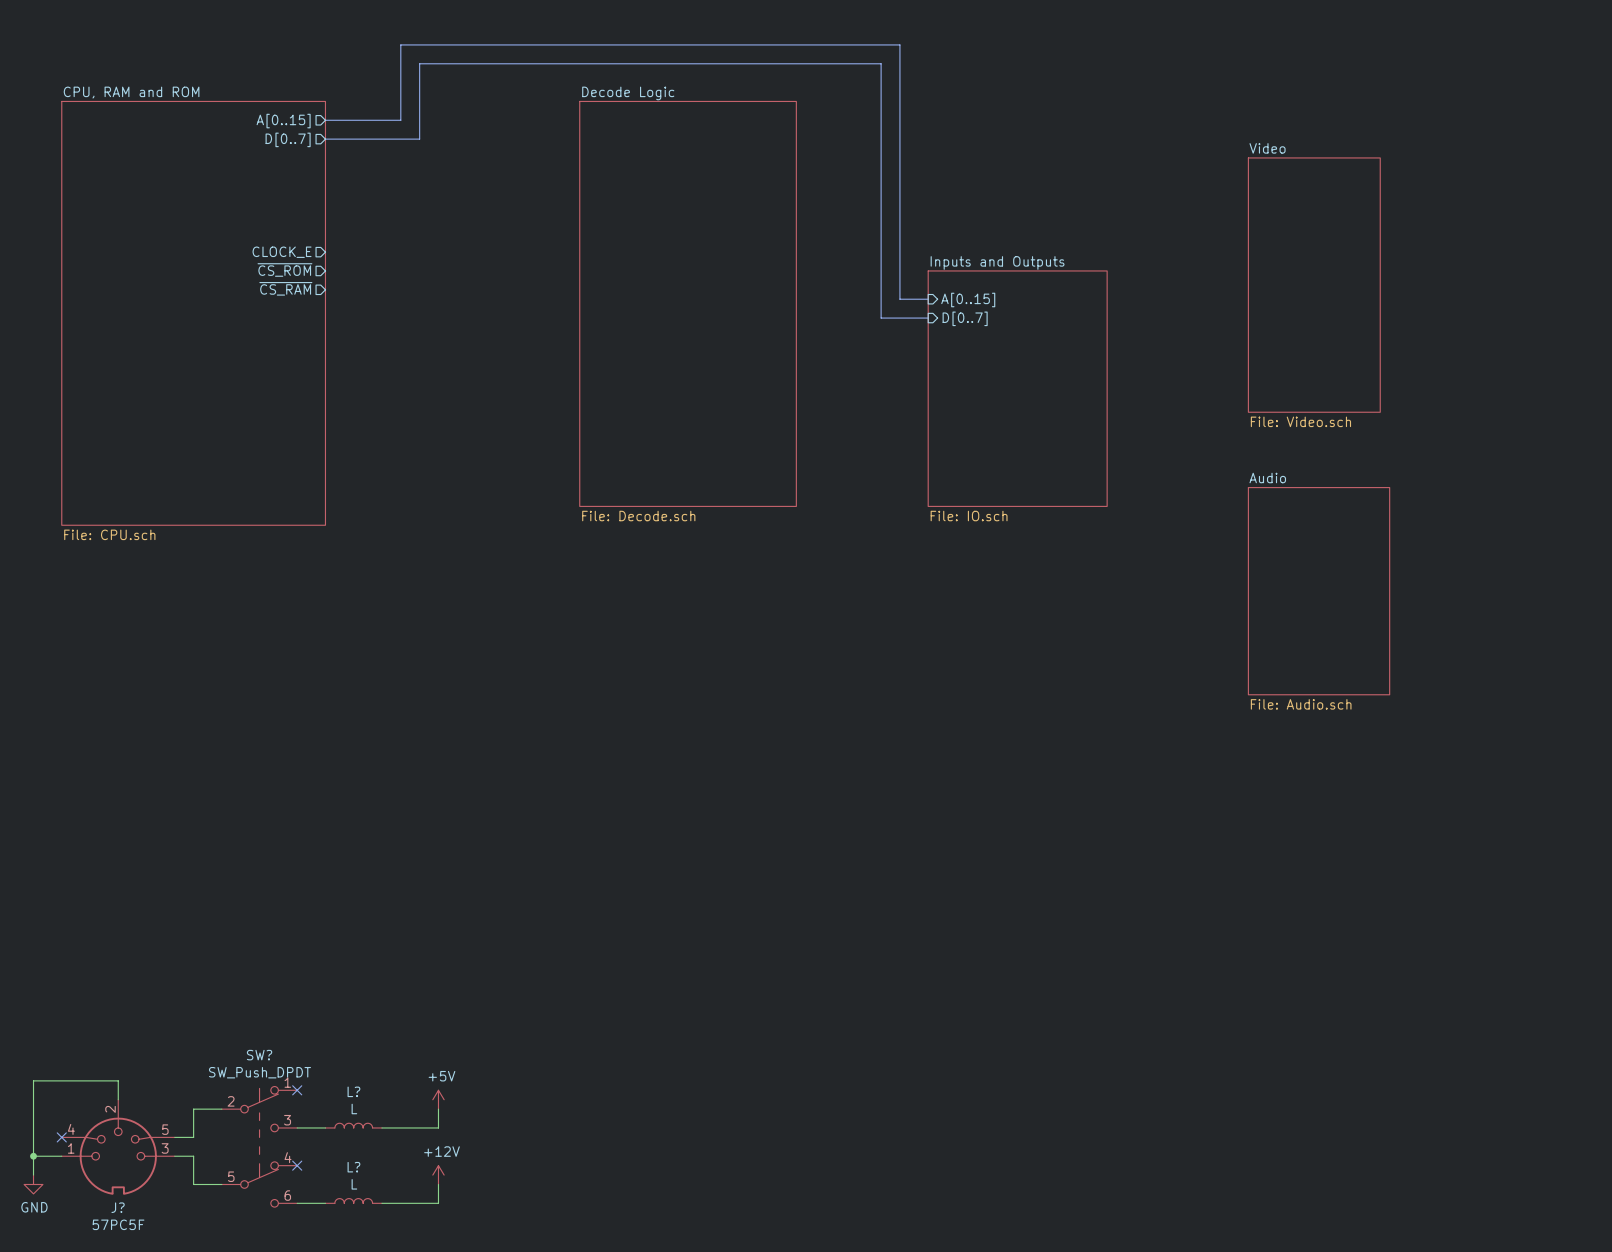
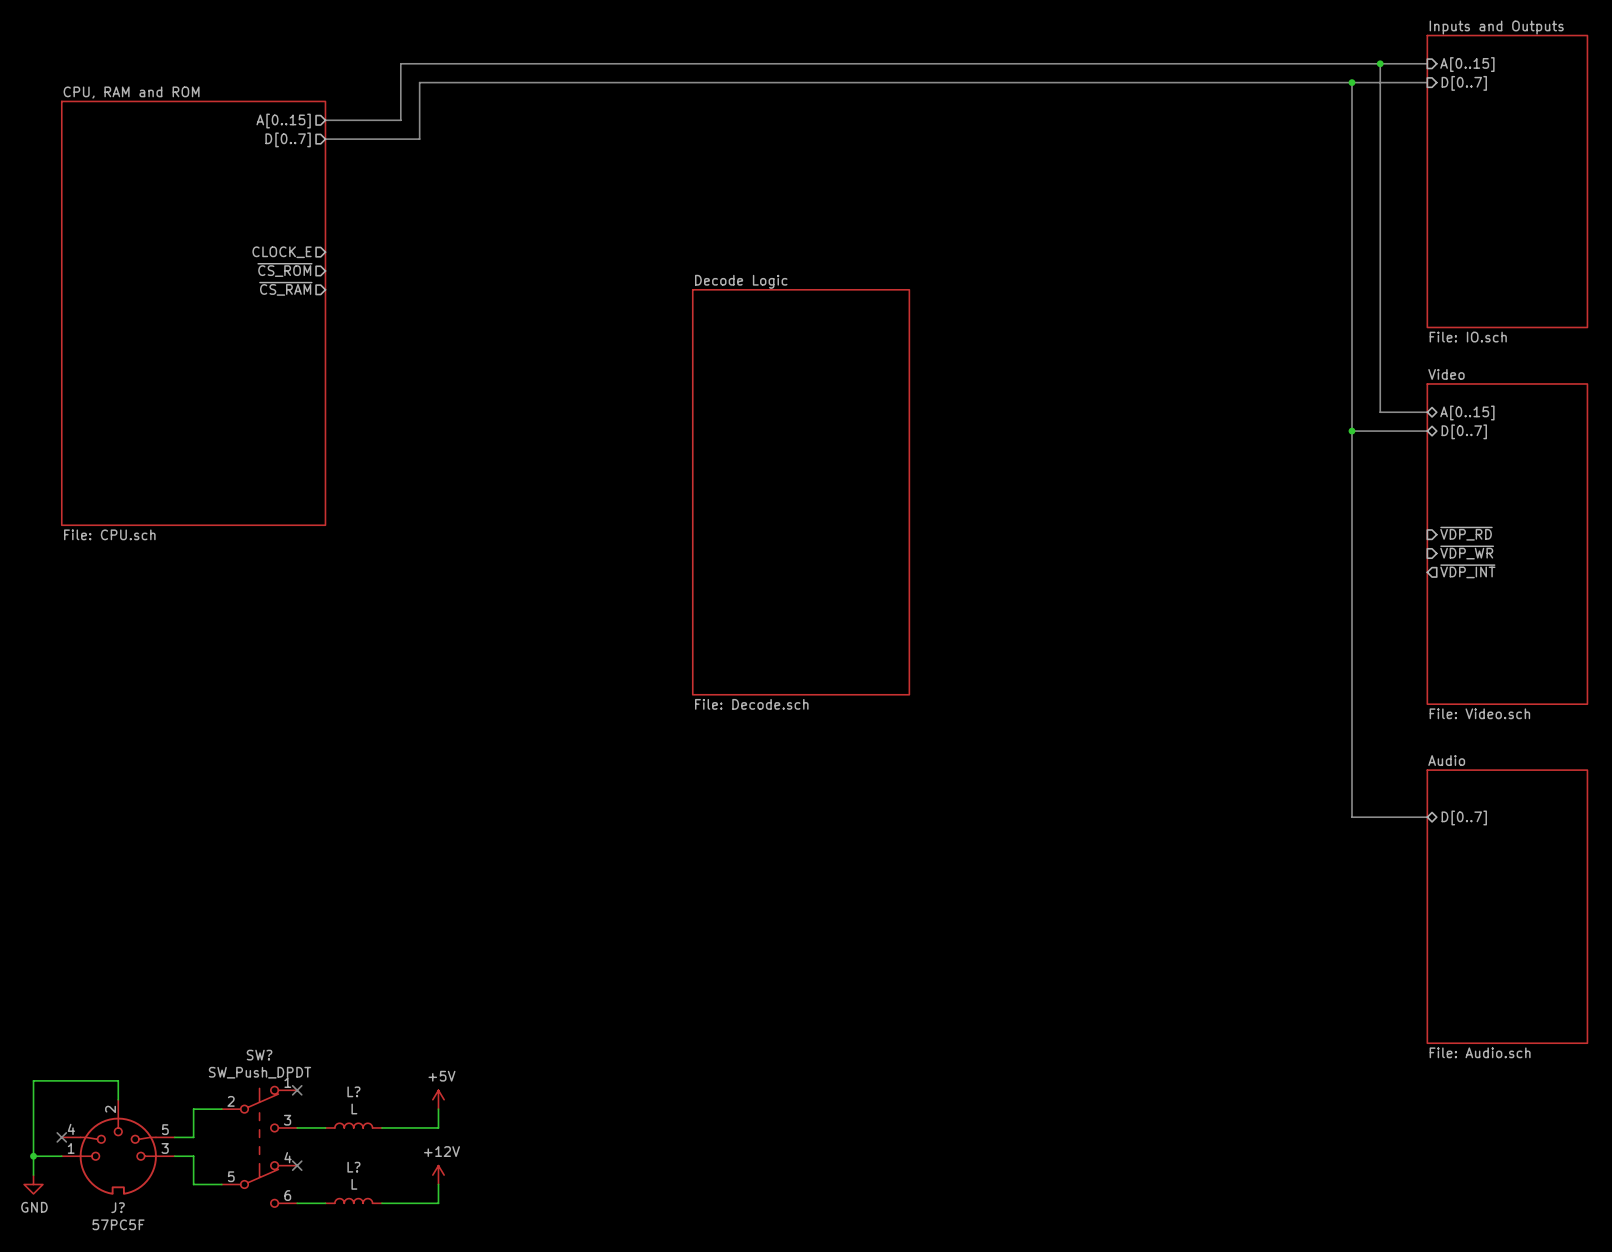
bus: (400, 63) (400, 44) (899, 44) (899, 299) (928, 299) -> none
bus: (419, 63) (419, 82) -> (419, 63) (400, 63)
bus: (881, 63) (881, 318) (928, 318) -> (881, 63) (1427, 63)
bus: none -> (1380, 63) (1380, 412) (1427, 412)
junction: none -> (1380, 63)
sheet pin: none -> A[0..15] (1467, 64)
bus: none -> (419, 82) (1427, 82)
bus: none -> (1351, 82) (1351, 817) (1427, 817)
junction: none -> (1351, 82)
sheet pin: none -> D[0..7] (1464, 83)
sheet Inputs and Outputs: none -> File: IO.sch (1507, 181)
sheet Video: File: Video.sch (1314, 285) -> none
sheet pin: A[0..15] (968, 299) -> none
sheet Decode Logic: File: Decode.sch (688, 303) -> none
sheet pin: D[0..7] (965, 318) -> none
sheet Inputs and Outputs: File: IO.sch (1017, 388) -> none
sheet pin: none -> A[0..15] (1467, 413)
bus: none -> (1351, 431) (1427, 431)
junction: none -> (1351, 431)
sheet pin: none -> D[0..7] (1464, 431)
sheet Decode Logic: none -> File: Decode.sch (801, 492)
sheet pin: none -> ~{VDP_RD} (1466, 533)
sheet Video: none -> File: Video.sch (1507, 544)
sheet pin: none -> ~{VDP_WR} (1467, 552)
sheet pin: none -> ~{VDP_INT} (1467, 571)
sheet Audio: File: Audio.sch (1319, 591) -> none
sheet pin: none -> D[0..7] (1464, 817)
sheet Audio: none -> File: Audio.sch (1507, 906)

